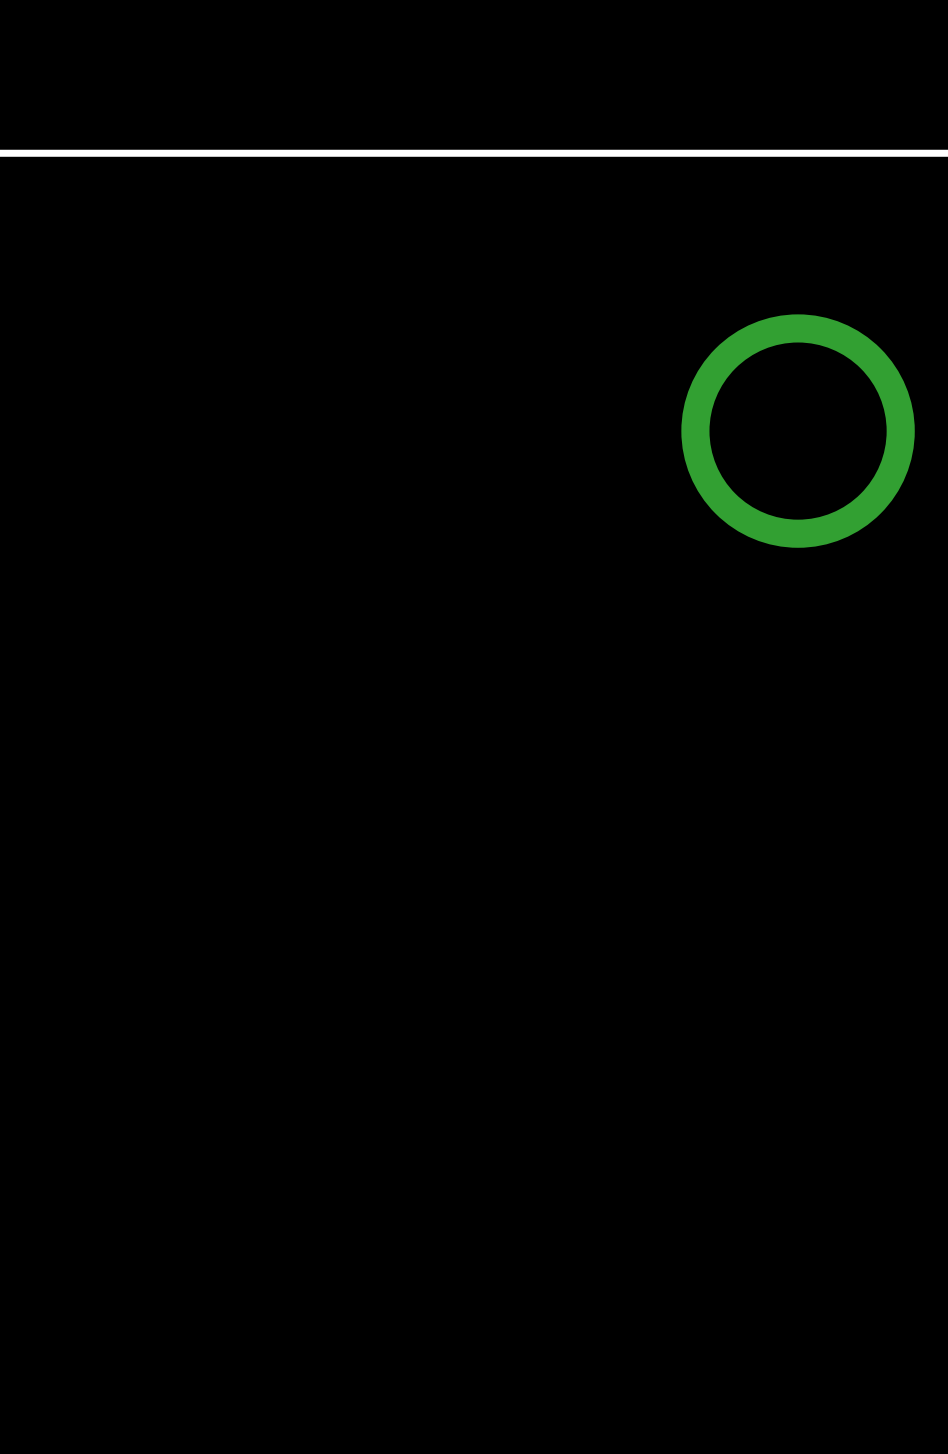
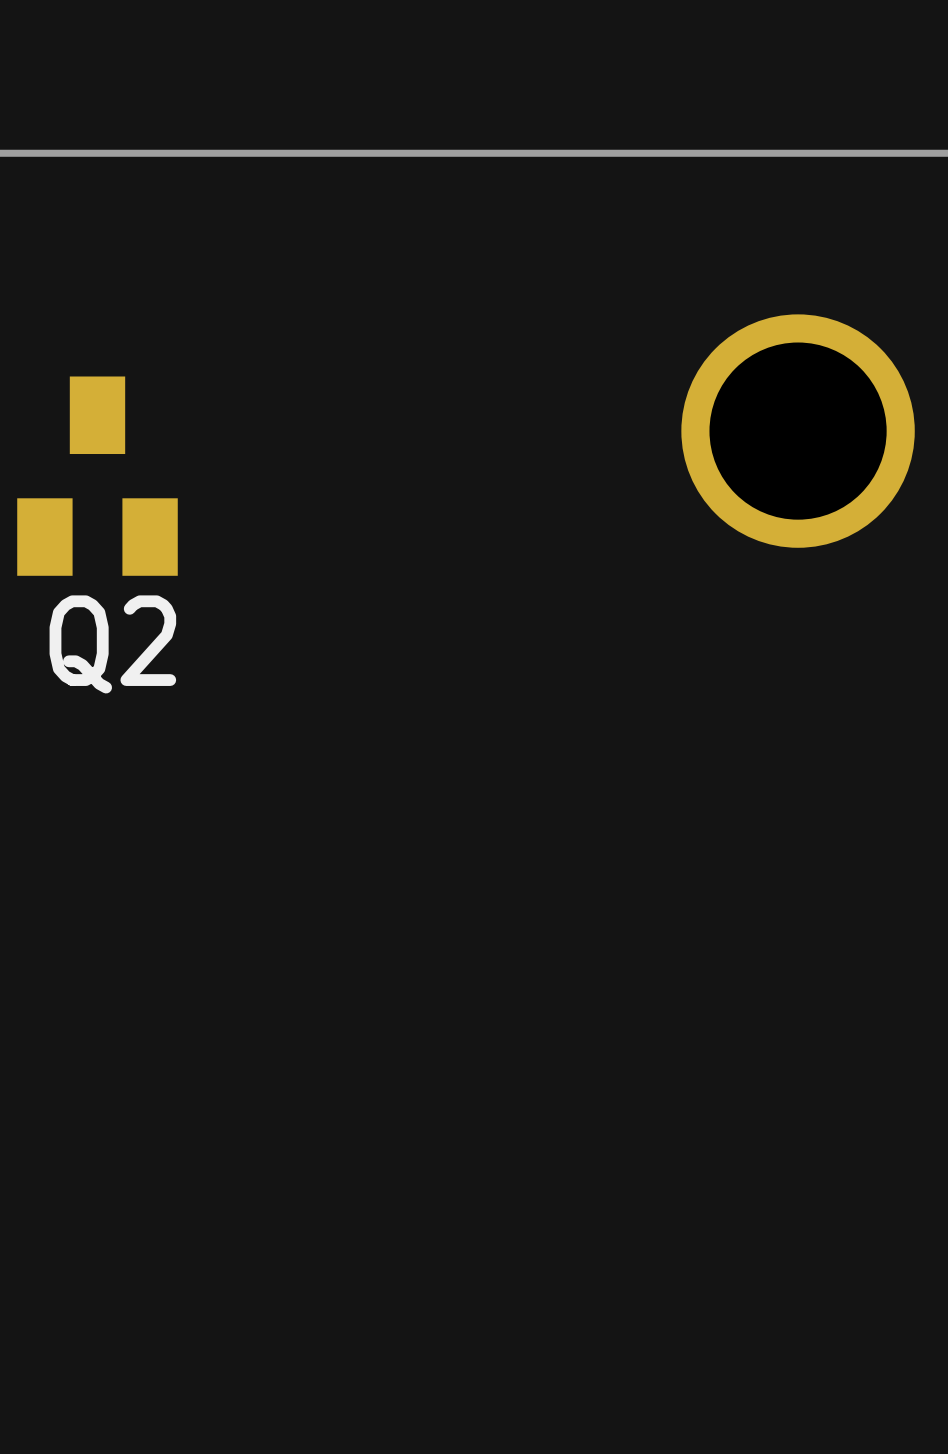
Q2: none -> (97, 476)

